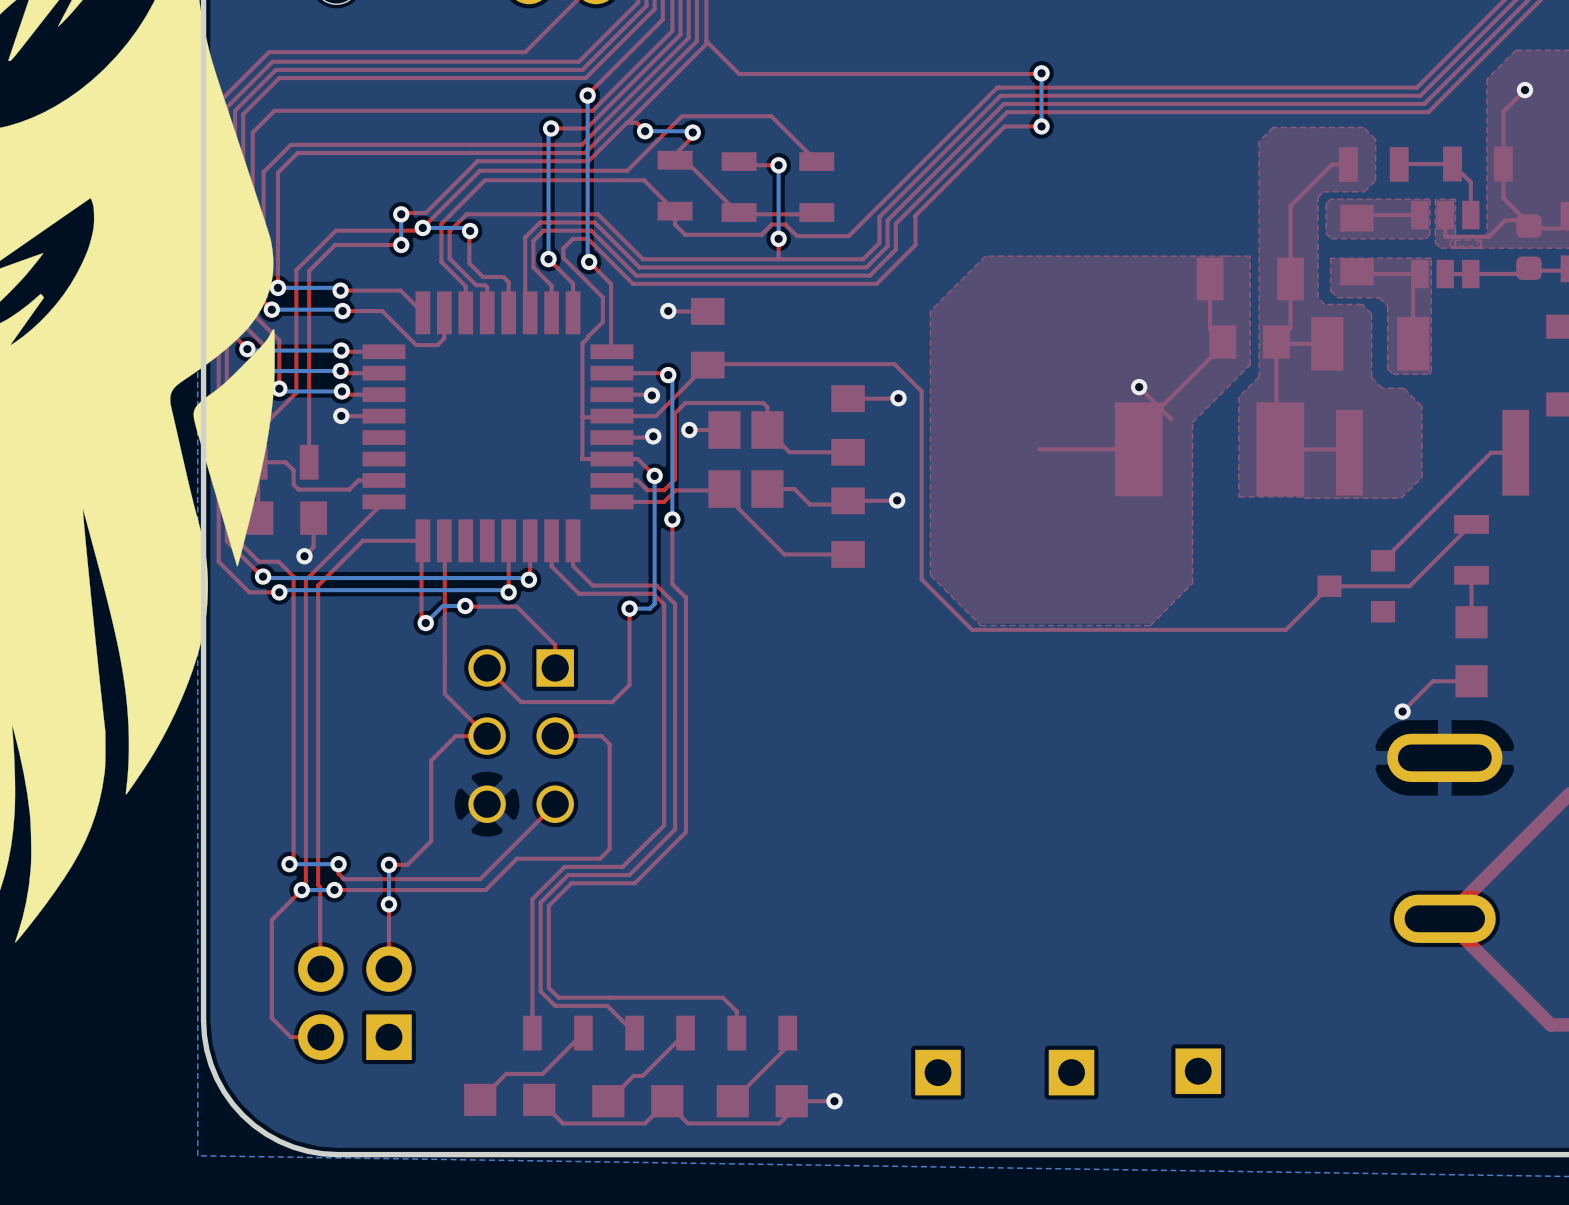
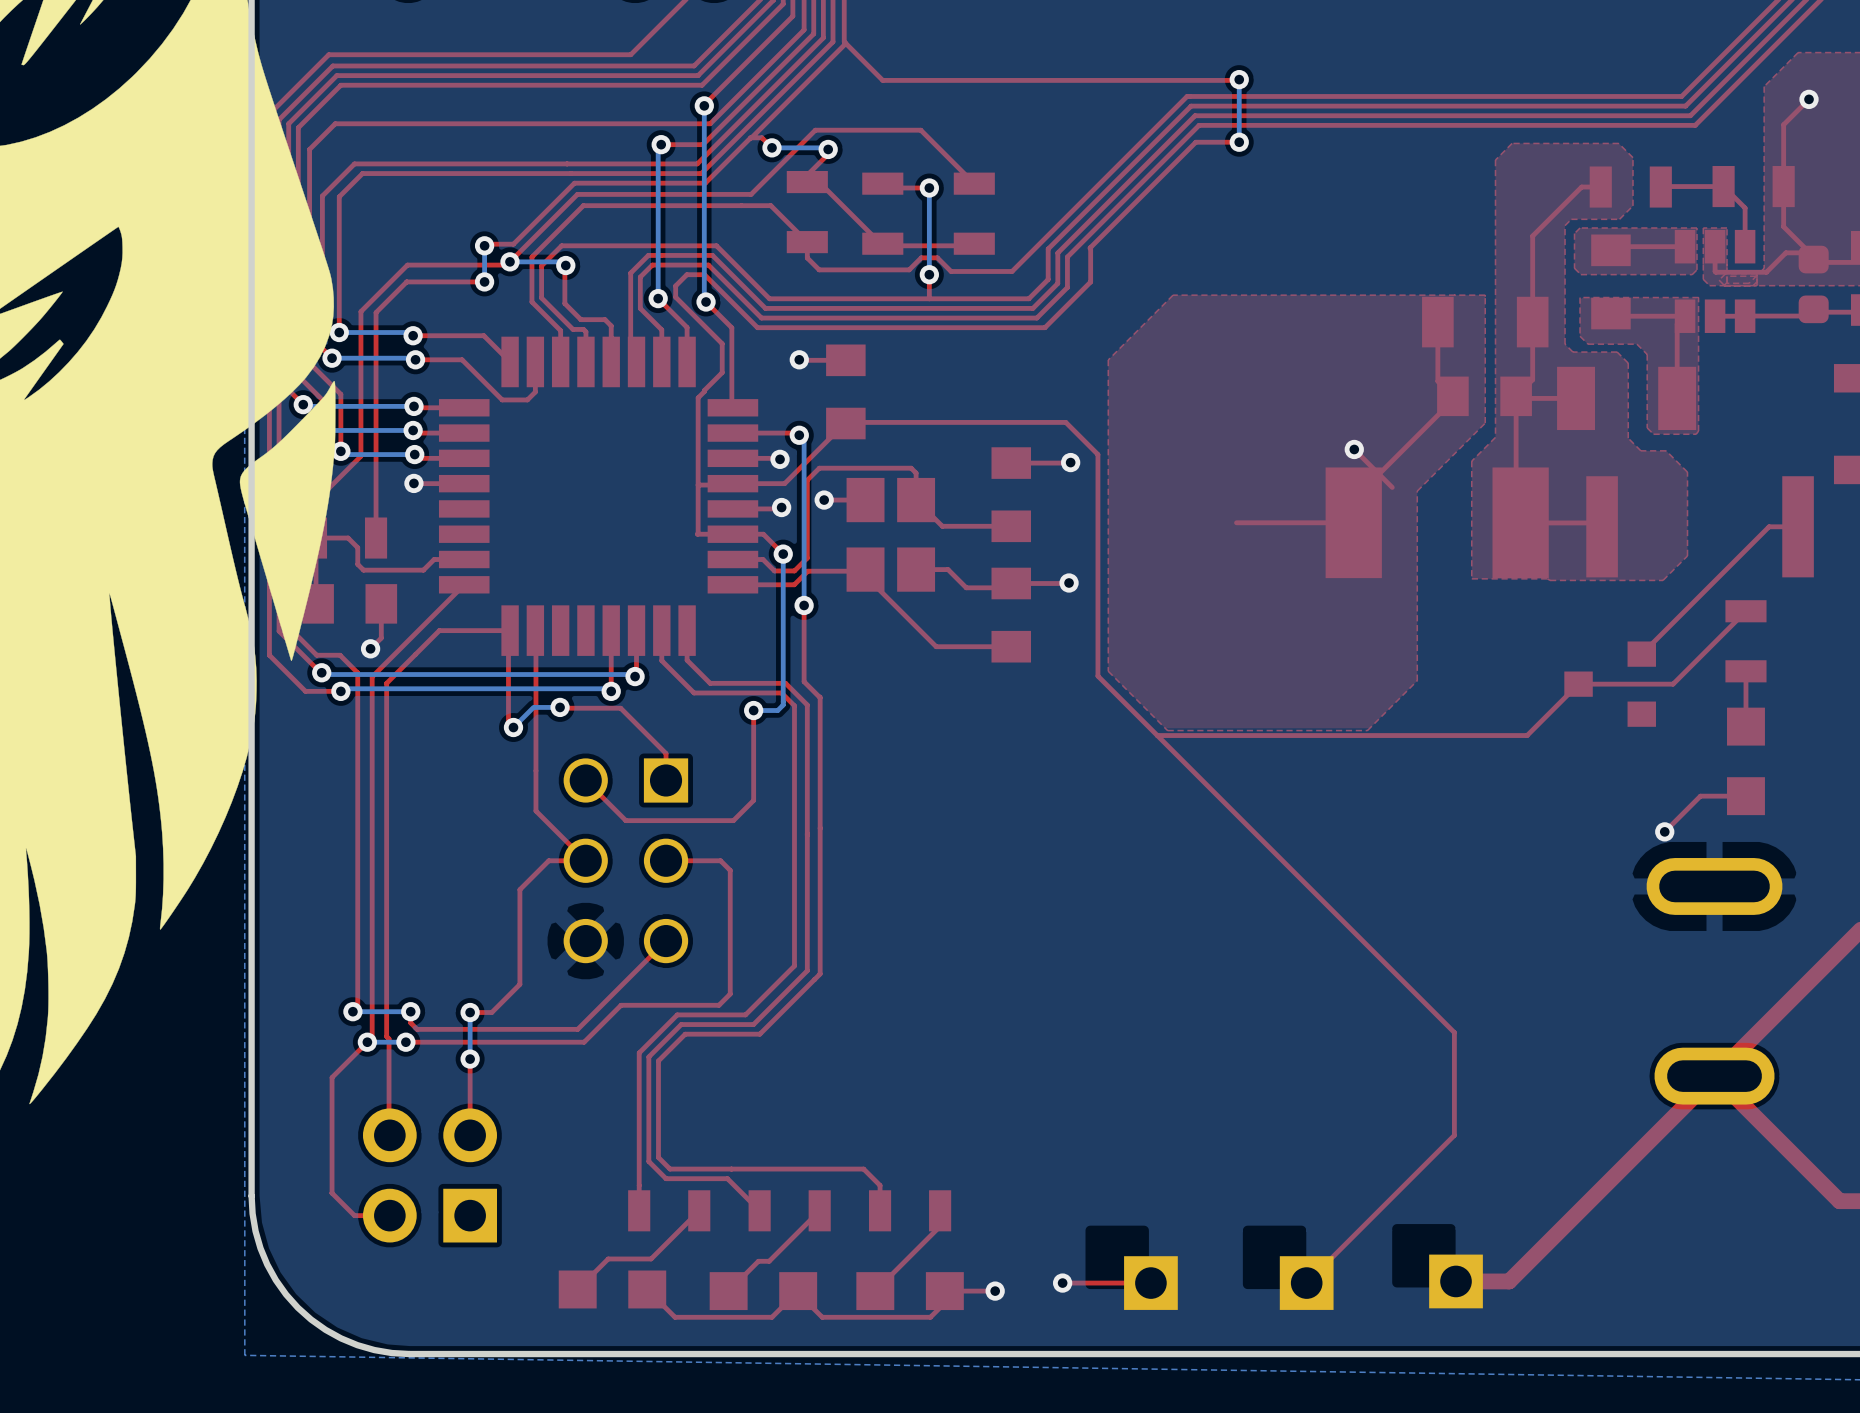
top track: none -> (1157, 735) (1454, 1032) (1454, 1135) (1306, 1283)
top track: none -> (1714, 1076) (1509, 1281) (1456, 1281)
part position: (1198, 1071) -> (1456, 1281)
part position: (938, 1072) -> (1150, 1283)
part position: (1071, 1072) -> (1306, 1283)
via: none -> (1062, 1283)
top track: none -> (1150, 1283) (1062, 1283)

